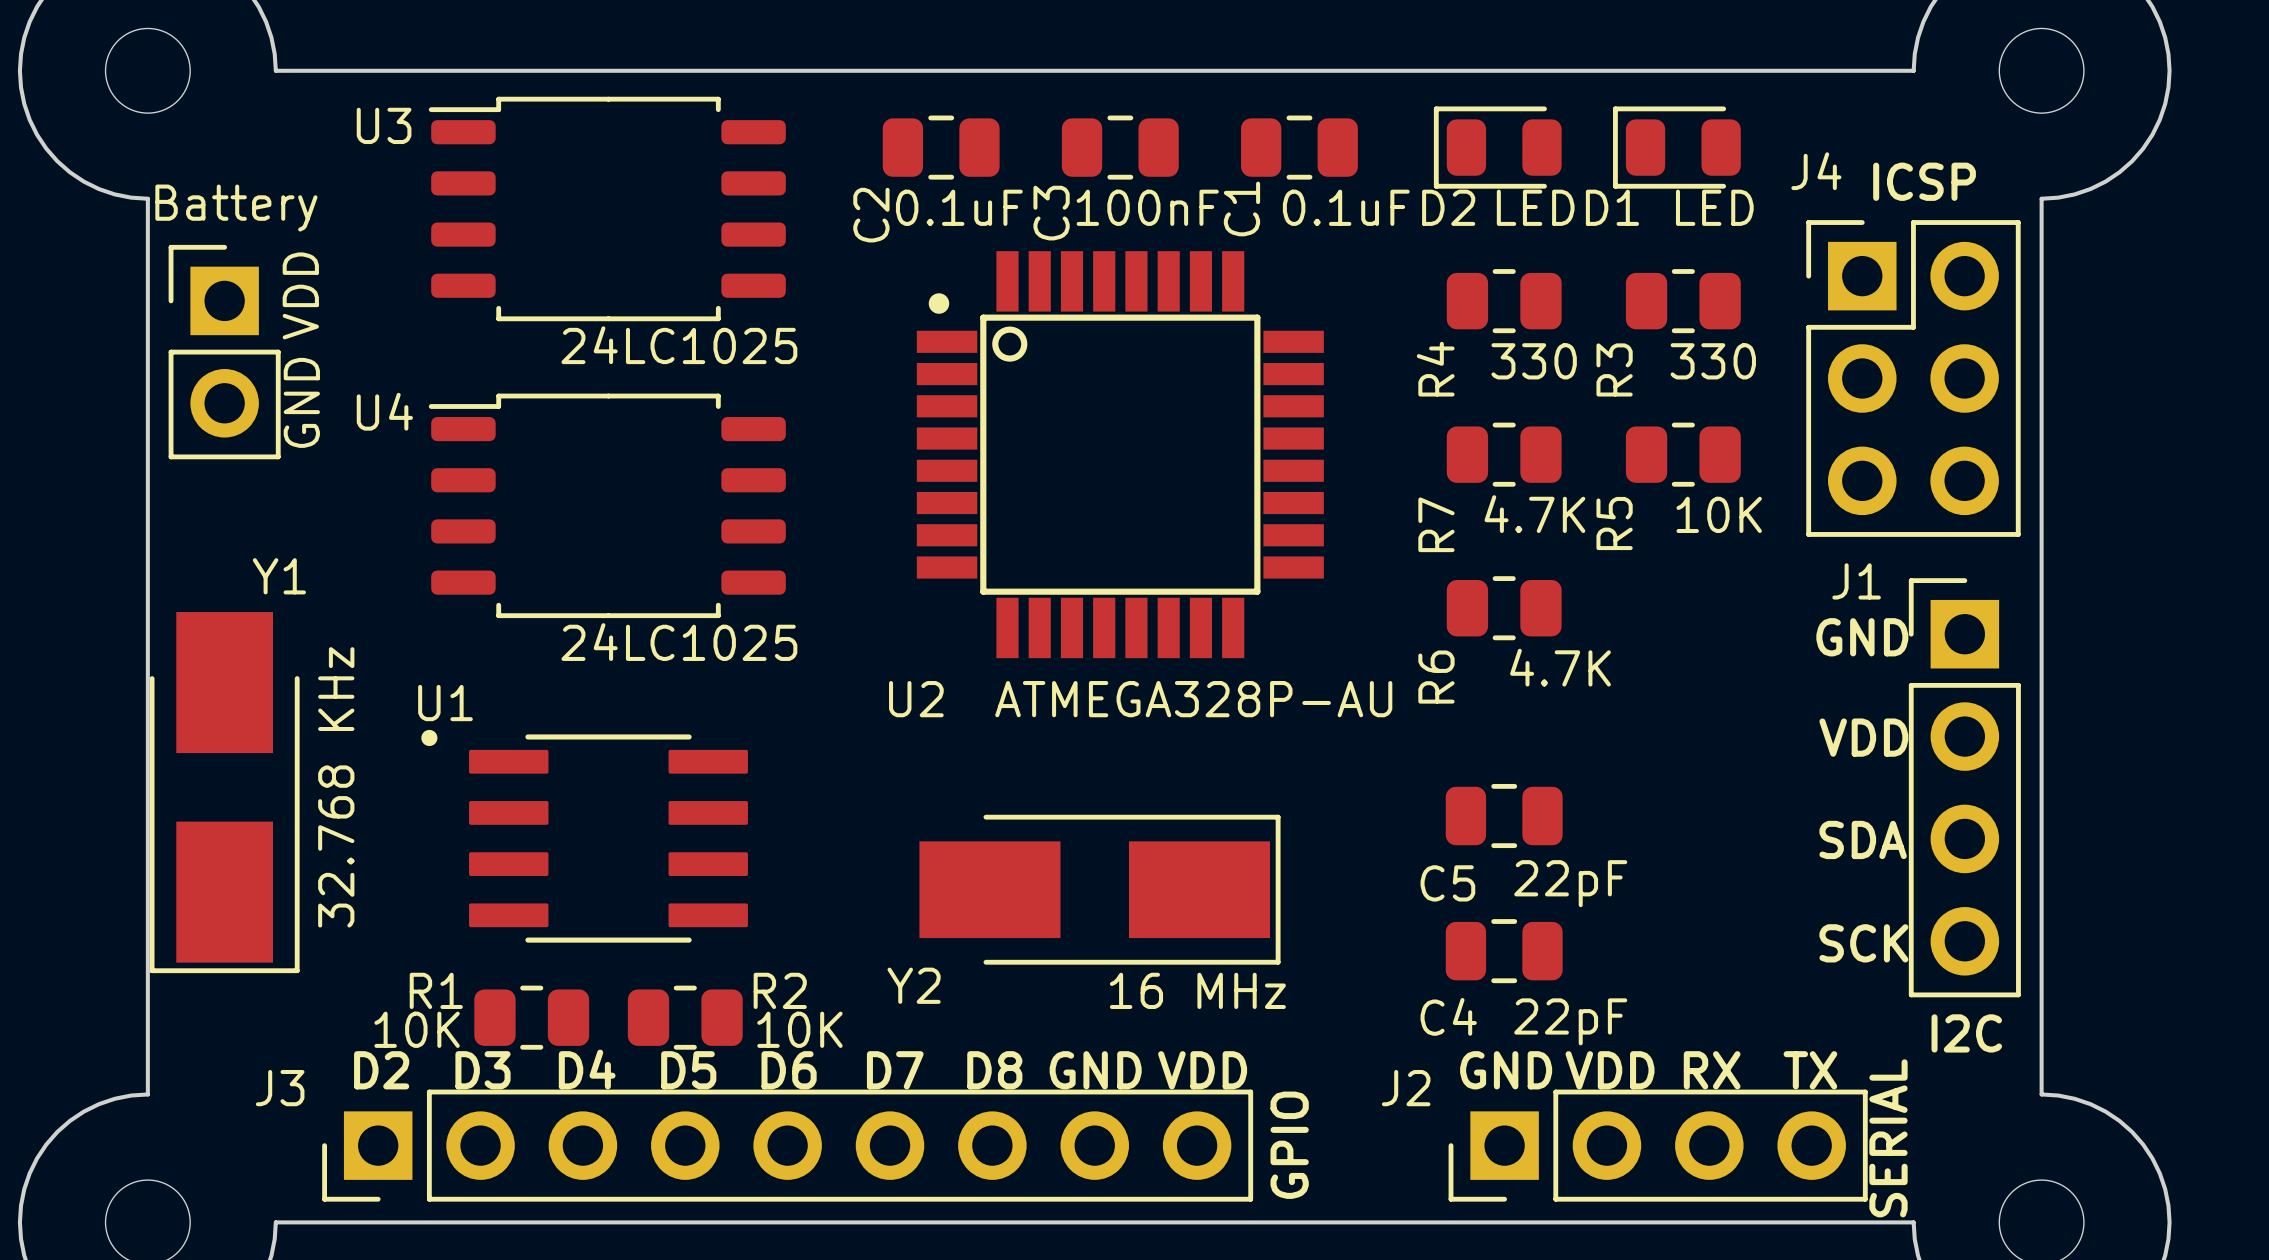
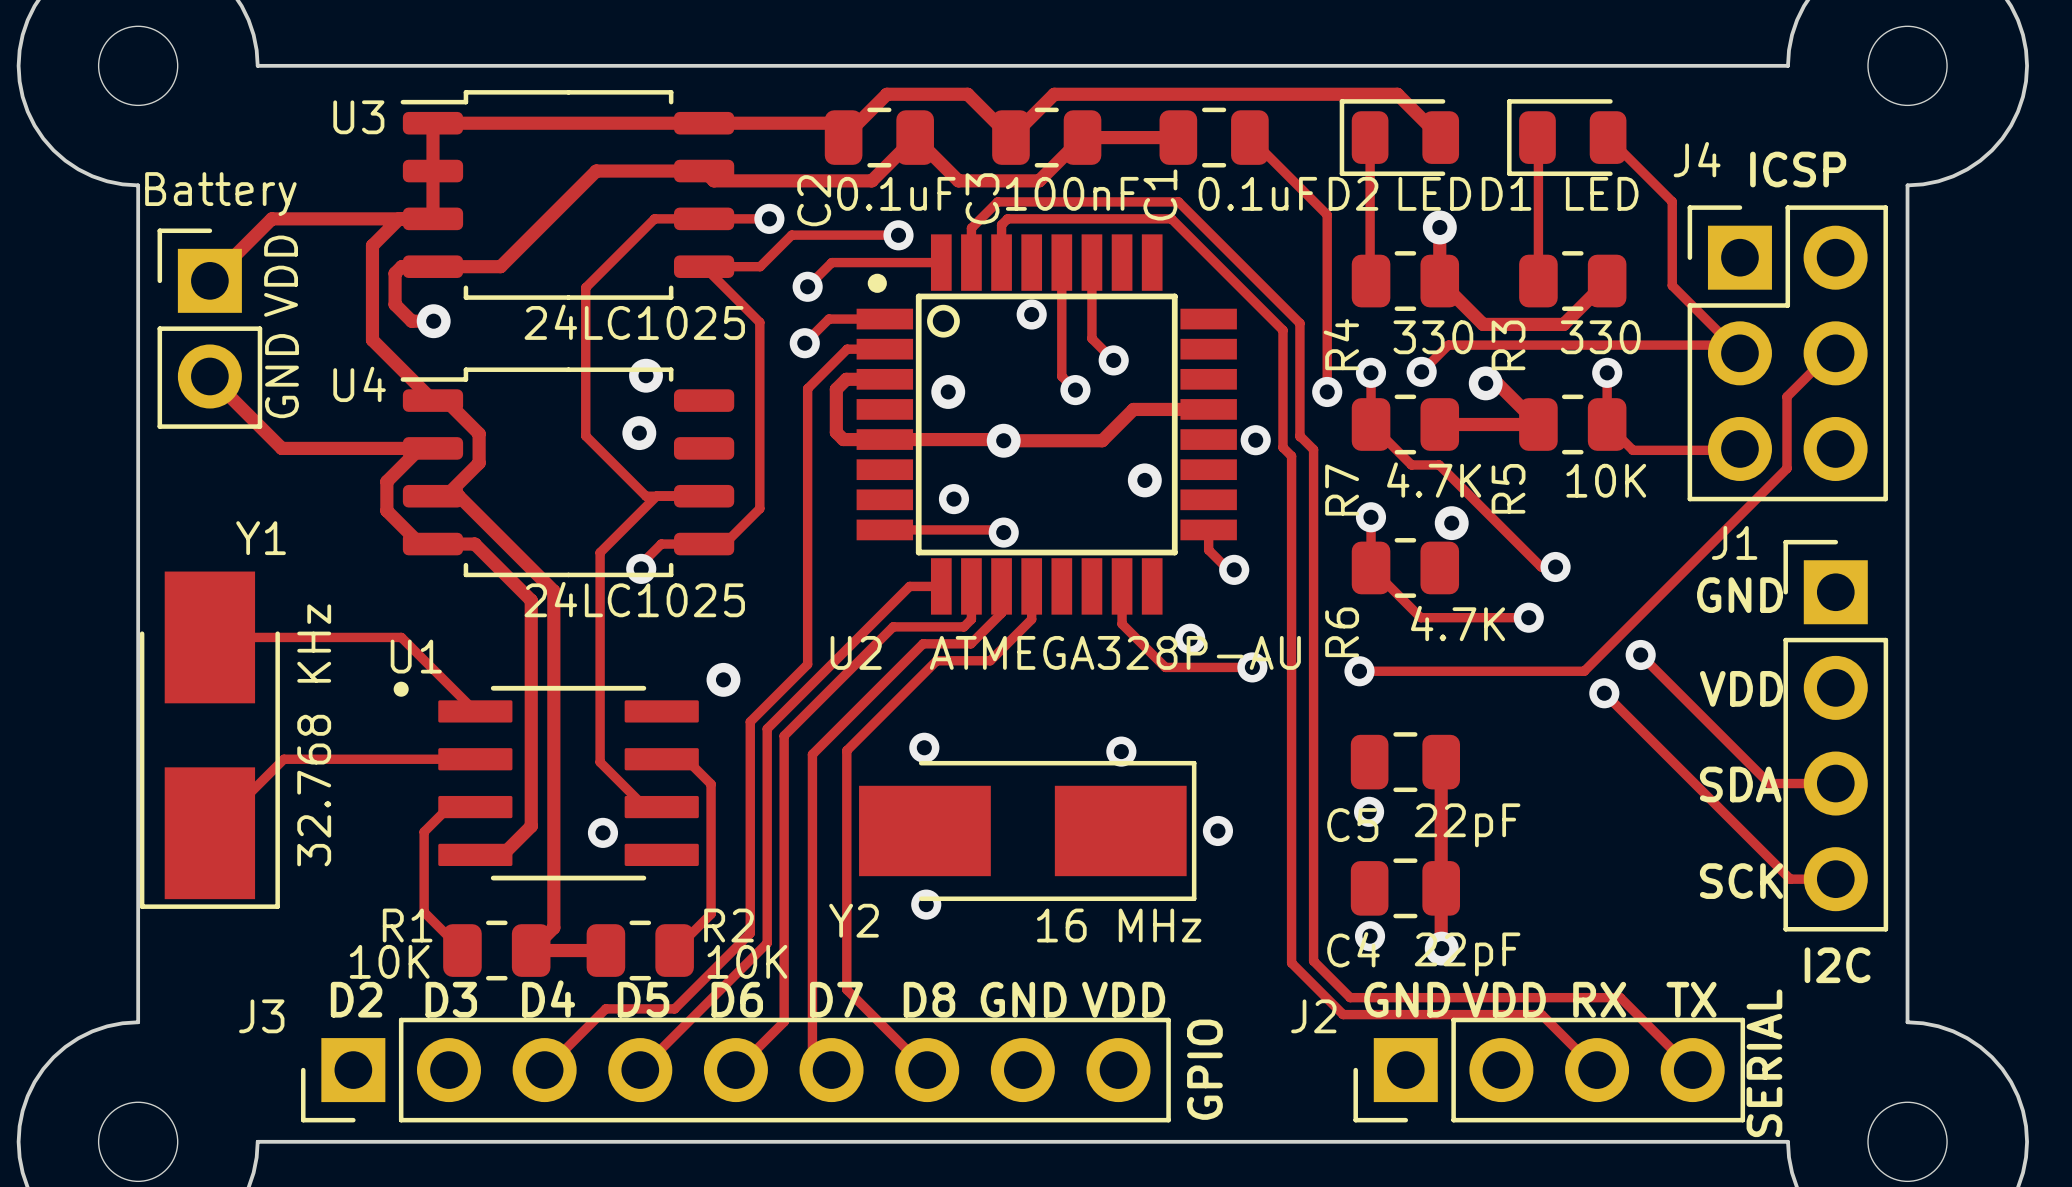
track: none -> (1178, 137) (1082, 137) (1039, 180) (958, 180) (915, 137) (871, 180) (713, 180) (704, 171) (596, 171) (500, 266) (401, 266) (395, 273) (395, 304) (411, 321) (433, 321)
track: none -> (1249, 137) (1327, 214) (1327, 391)
track: none -> (1370, 137) (1371, 281)
track: none -> (1440, 137) (1397, 94) (1054, 94) (1010, 137) (967, 94) (886, 94) (843, 137) (829, 123) (432, 123) (432, 218) (271, 218) (209, 280)
track: none -> (1537, 137) (1538, 281)
track: none -> (1608, 137) (1672, 201) (1672, 285) (1739, 353)
track: none -> (399, 218) (372, 245) (372, 340) (432, 400) (445, 400) (479, 433) (479, 463) (445, 496)
track: none -> (769, 218) (654, 218) (585, 287) (585, 435) (646, 496) (704, 496)
via: none -> (769, 218)
track: none -> (1439, 227) (1439, 281) (1483, 324) (1563, 324) (1607, 281)
via: none -> (1439, 227)
track: none -> (898, 235) (791, 235) (760, 266) (704, 266) (759, 322) (759, 508) (724, 544) (661, 544) (641, 564) (641, 568)
via: none -> (898, 235)
track: none -> (941, 262) (831, 262) (807, 286)
track: none -> (971, 262) (971, 228) (997, 201) (1178, 201) (1299, 323) (1299, 436)
track: none -> (1001, 262) (1001, 224) (1007, 218) (1171, 218) (1282, 330) (1282, 447) (1291, 456) (1291, 963) (1343, 1014) (1541, 1014) (1597, 1070)
track: none -> (1061, 262) (1061, 376) (1075, 390)
track: none -> (1091, 262) (1091, 338) (1113, 360)
via: none -> (807, 286)
via: none -> (1031, 314)
track: none -> (884, 319) (828, 319) (804, 343)
via: none -> (433, 321)
via: none -> (804, 343)
track: none -> (1731, 345) (1448, 345) (1421, 371)
track: none -> (884, 349) (847, 349) (807, 388) (807, 664) (750, 721) (750, 933) (674, 1008) (605, 1008) (544, 1070)
track: none -> (1835, 353) (1830, 353) (1787, 396) (1787, 468) (1584, 671) (1359, 671)
via: none -> (1113, 360)
via: none -> (1421, 371)
track: none -> (1371, 372) (1371, 424) (1411, 464) (1439, 464) (1541, 567) (1555, 567)
via: none -> (1370, 372)
track: none -> (1607, 372) (1607, 424) (1632, 450) (1739, 448)
via: none -> (1607, 372)
via: none -> (646, 375)
track: none -> (209, 376) (281, 448) (432, 448)
track: none -> (884, 379) (846, 379) (836, 389) (836, 432) (843, 439) (1102, 440) (1133, 409) (1208, 409)
track: none -> (1485, 383) (1497, 383) (1538, 424) (1439, 424)
via: none -> (1485, 383)
via: none -> (1075, 390)
via: none -> (948, 391)
via: none -> (1327, 391)
via: none -> (639, 433)
track: none -> (1299, 435) (1313, 449) (1313, 961) (1350, 997) (1620, 997) (1692, 1070)
via: none -> (1255, 440)
via: none -> (1003, 440)
track: none -> (420, 448) (386, 481) (386, 510) (420, 544) (474, 544) (531, 600) (531, 826) (502, 854) (475, 854)
via: none -> (1144, 480)
track: none -> (432, 496) (458, 496) (553, 591) (553, 927) (531, 950) (605, 950)
track: none -> (656, 496) (600, 552) (600, 762) (644, 807) (661, 807)
via: none -> (953, 499)
via: none -> (1370, 517)
track: none -> (1371, 517) (1371, 567) (1420, 617) (1528, 617)
via: none -> (1451, 523)
track: none -> (884, 529) (1001, 529) (1003, 532)
track: none -> (1208, 529) (1208, 550) (1228, 569) (1234, 569)
via: none -> (1003, 532)
via: none -> (1555, 567)
via: none -> (641, 568)
via: none -> (1234, 569)
track: none -> (941, 586) (909, 586) (767, 728) (767, 943) (640, 1070)
track: none -> (971, 586) (971, 619) (963, 626) (893, 626) (784, 735) (784, 1021) (735, 1070)
track: none -> (1001, 586) (1001, 613) (970, 643) (923, 643) (812, 754) (812, 1050) (831, 1070)
track: none -> (1031, 586) (1031, 619) (990, 660) (936, 660) (846, 750) (846, 989) (927, 1070)
track: none -> (1122, 586) (1122, 624) (1165, 667) (1252, 667)
via: none -> (1528, 617)
track: none -> (209, 637) (401, 637) (475, 711)
via: none -> (1190, 638)
track: none -> (1640, 654) (1769, 783) (1835, 783)
via: none -> (1640, 654)
via: none -> (1252, 667)
via: none -> (1359, 671)
via: none -> (723, 679)
track: none -> (1604, 693) (1790, 879) (1835, 879)
via: none -> (1604, 693)
via: none -> (924, 747)
via: none -> (1121, 751)
track: none -> (475, 759) (283, 759) (209, 833)
track: none -> (661, 759) (686, 759) (711, 784) (711, 914) (674, 950)
track: none -> (1441, 762) (1441, 948)
track: none -> (475, 807) (448, 807) (424, 831) (424, 912) (462, 950)
via: none -> (1369, 811)
via: none -> (1217, 830)
via: none -> (602, 832)
via: none -> (926, 904)
via: none -> (1370, 936)
via: none -> (1441, 948)

